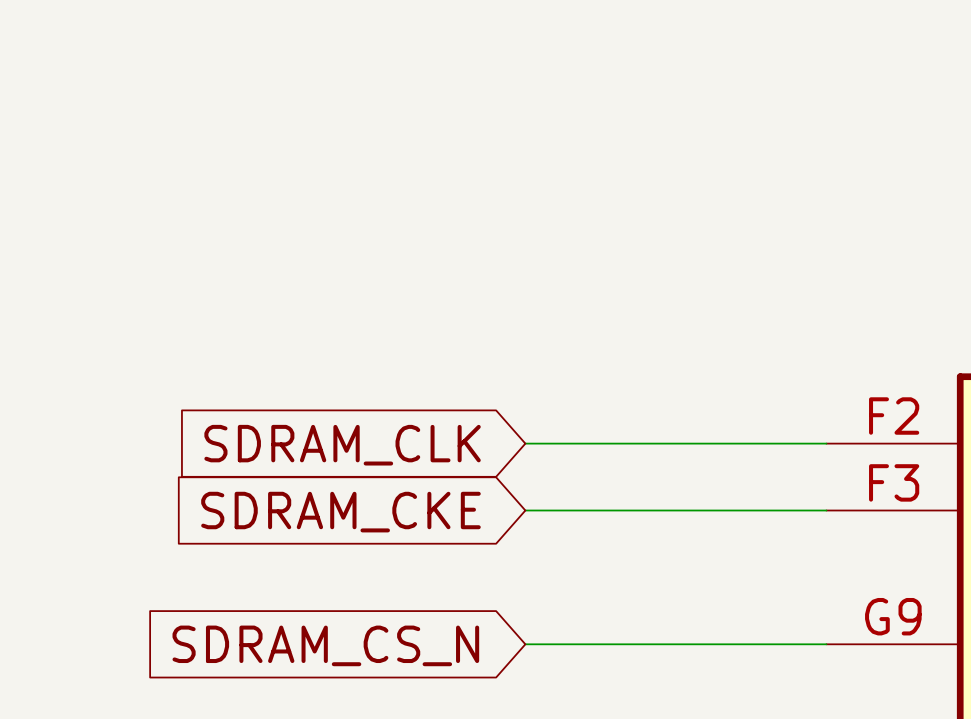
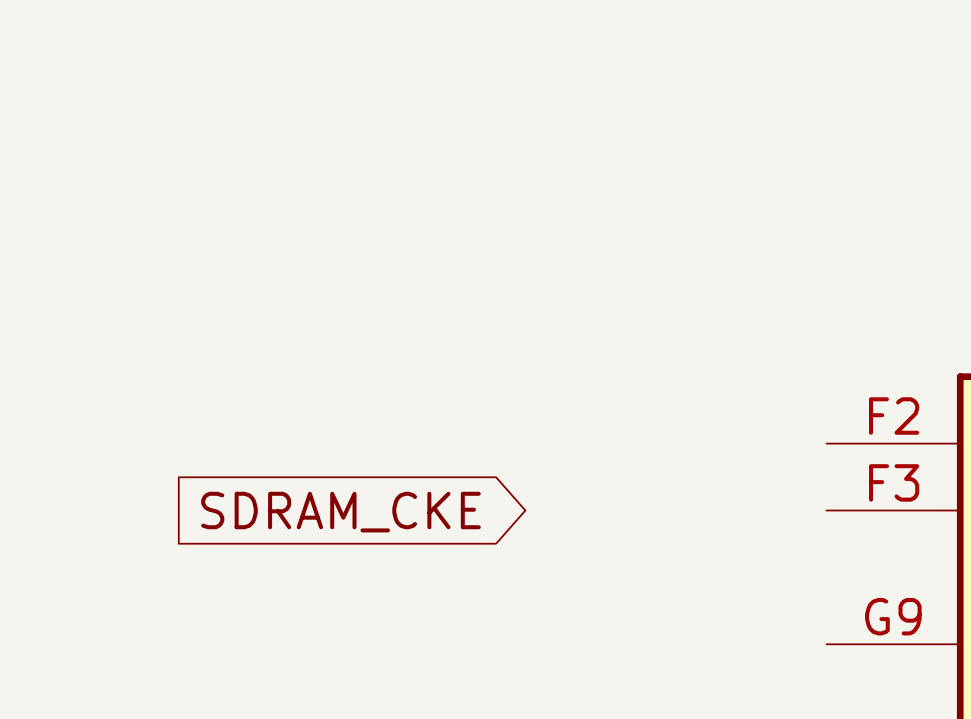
wire: (525, 443) (826, 443) -> none
global label: SDRAM_CLK (342, 445) -> none
wire: (525, 510) (826, 510) -> none
wire: (525, 644) (826, 644) -> none
global label: SDRAM_CS_N (325, 645) -> none

